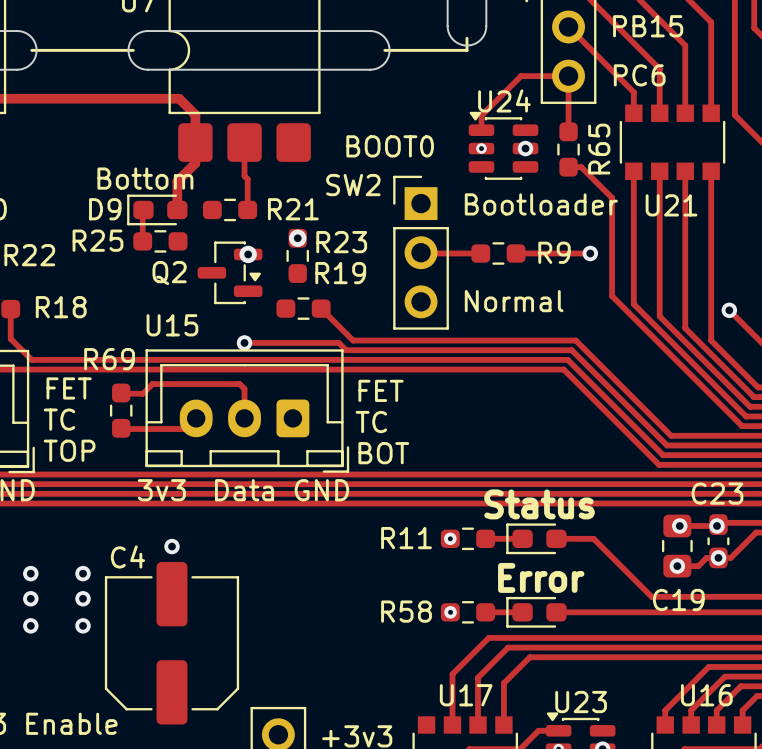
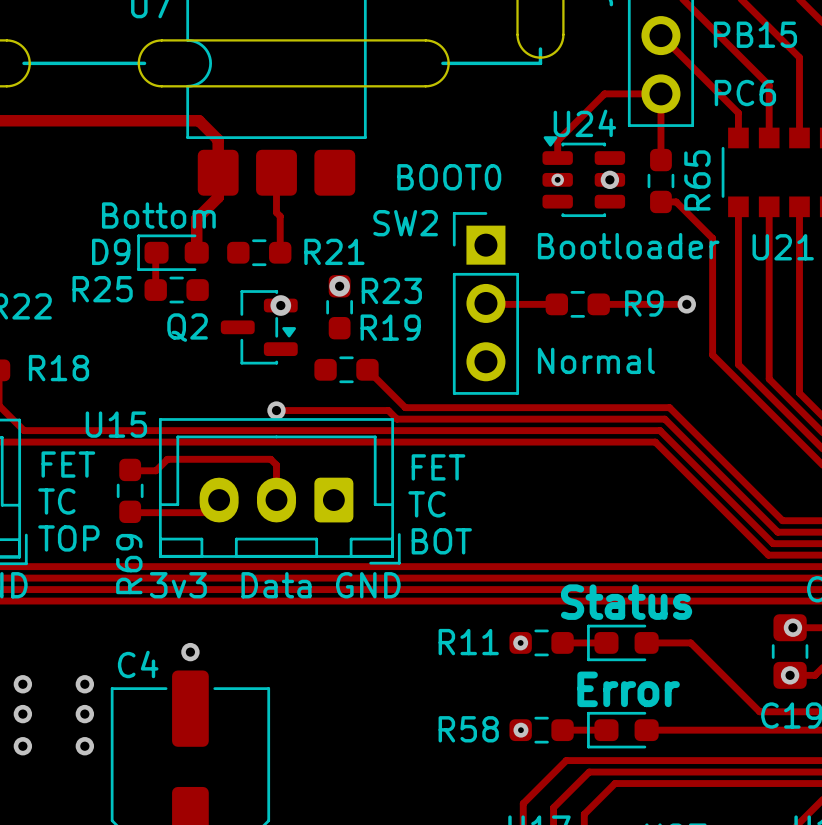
U15 name position: U15 (172, 325) -> U15 (116, 424)
R69 name rotation: 0° (109, 359) -> 90° counterclockwise (129, 564)
R69 name position: R69 (109, 359) -> R69 (129, 564)

